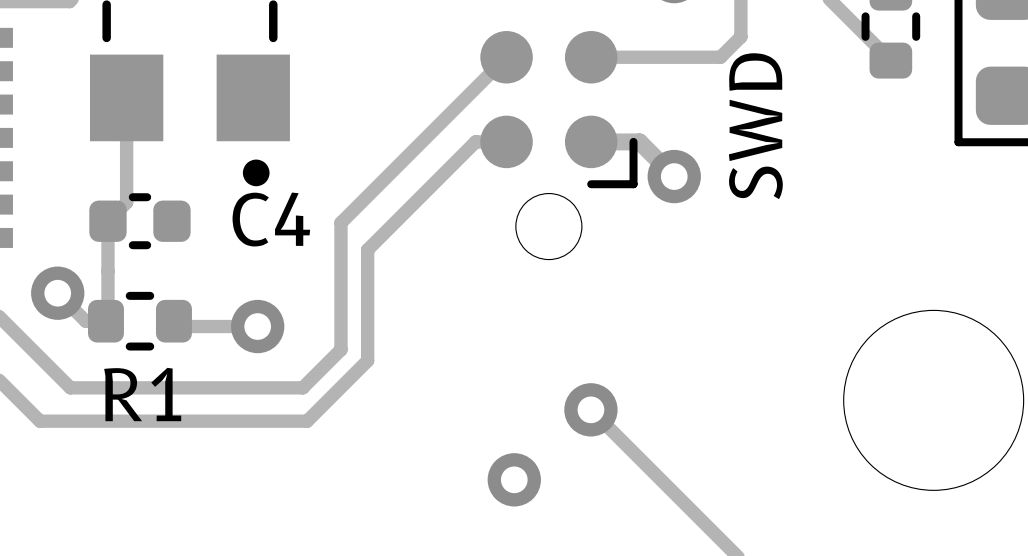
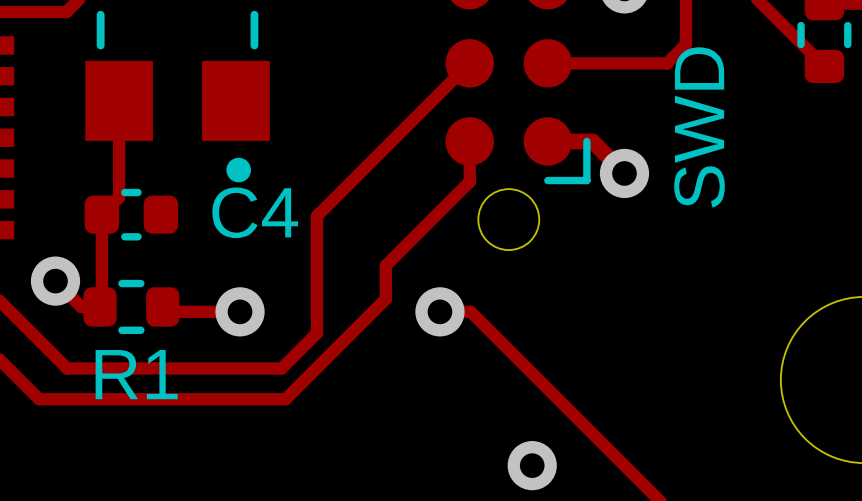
track: (506, 141) (475, 141) (367, 249) (367, 360) -> (469, 141) (469, 181) (385, 265) (385, 299) (341, 343)
track: none -> (439, 311) (470, 311) (547, 388)
via: none -> (439, 311)
via: (590, 409) -> none
via: (514, 479) -> none
via: none -> (532, 465)

